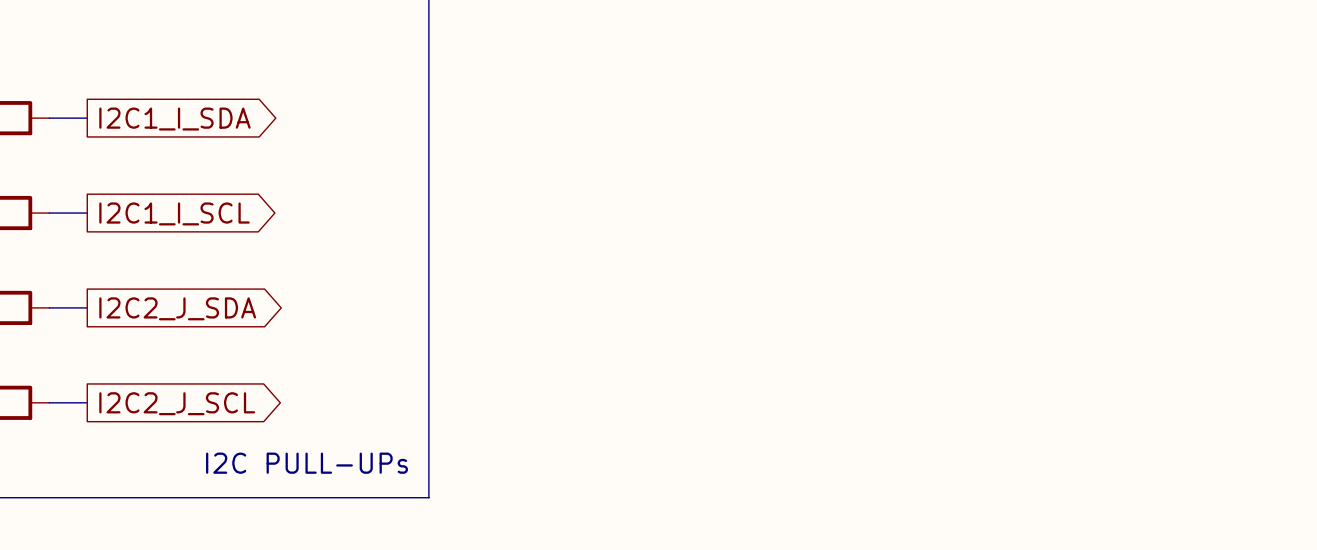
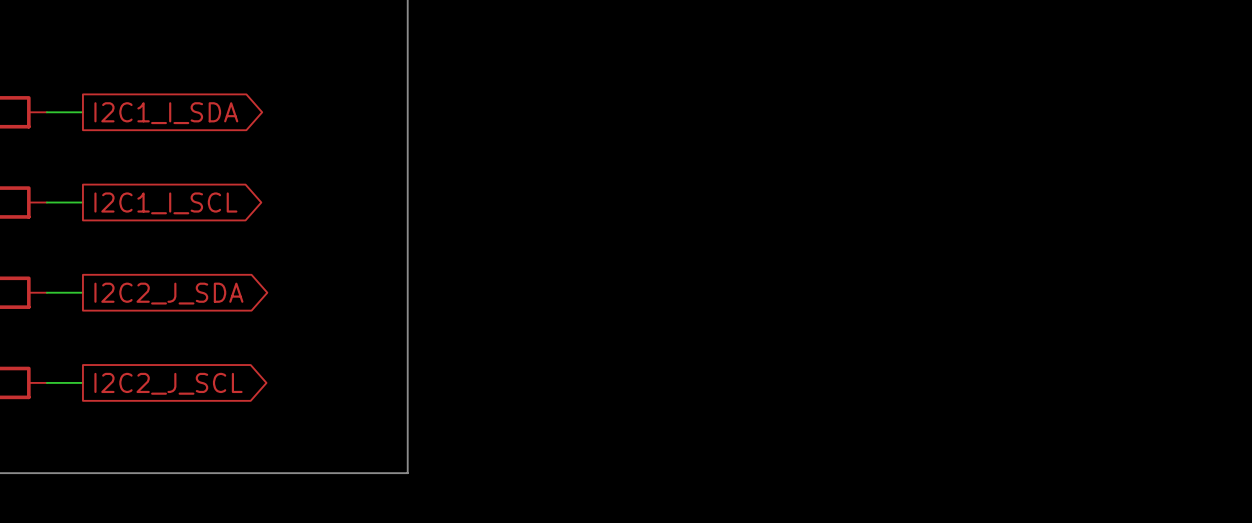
text: I2C PULL-UPs (307, 463) -> none

